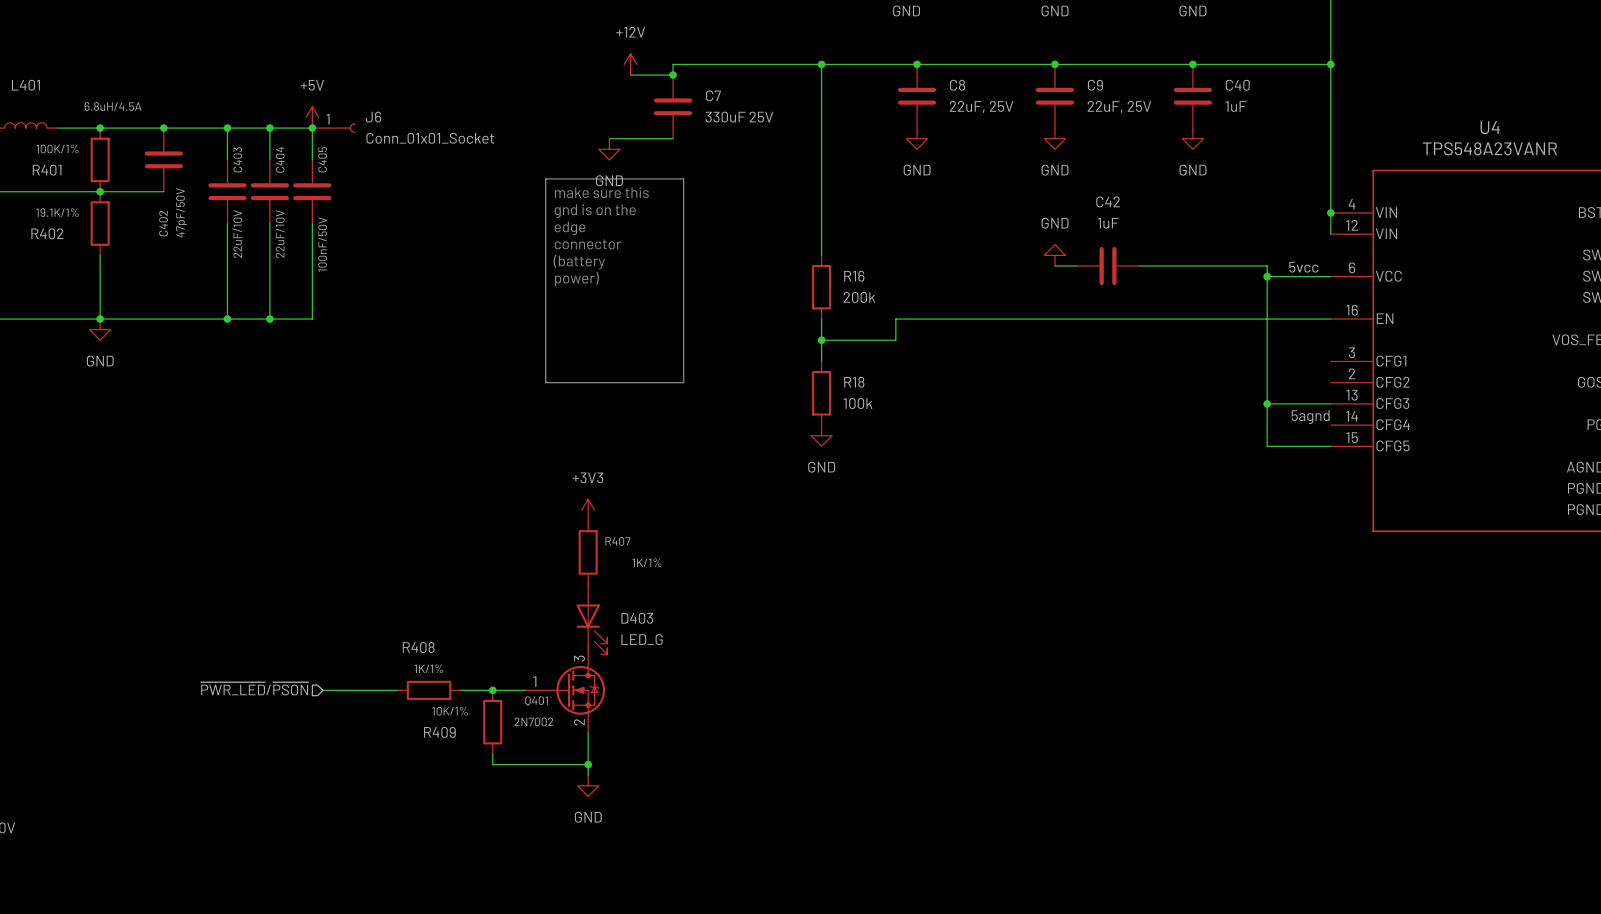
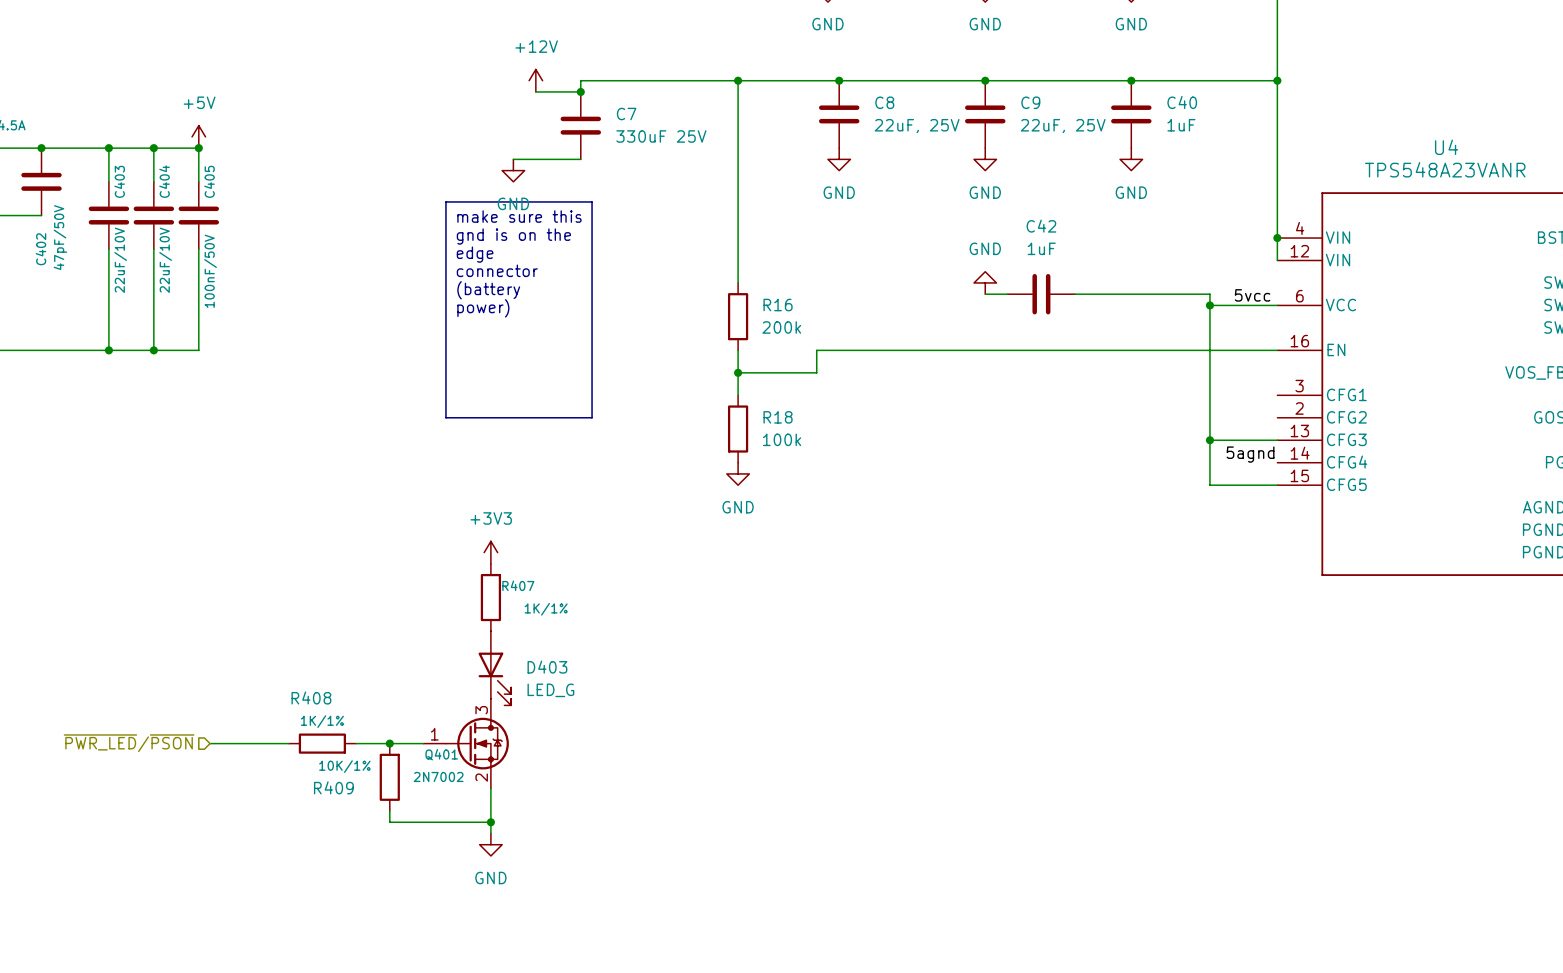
J6: Conn_01x01_Socket (333, 128) -> none

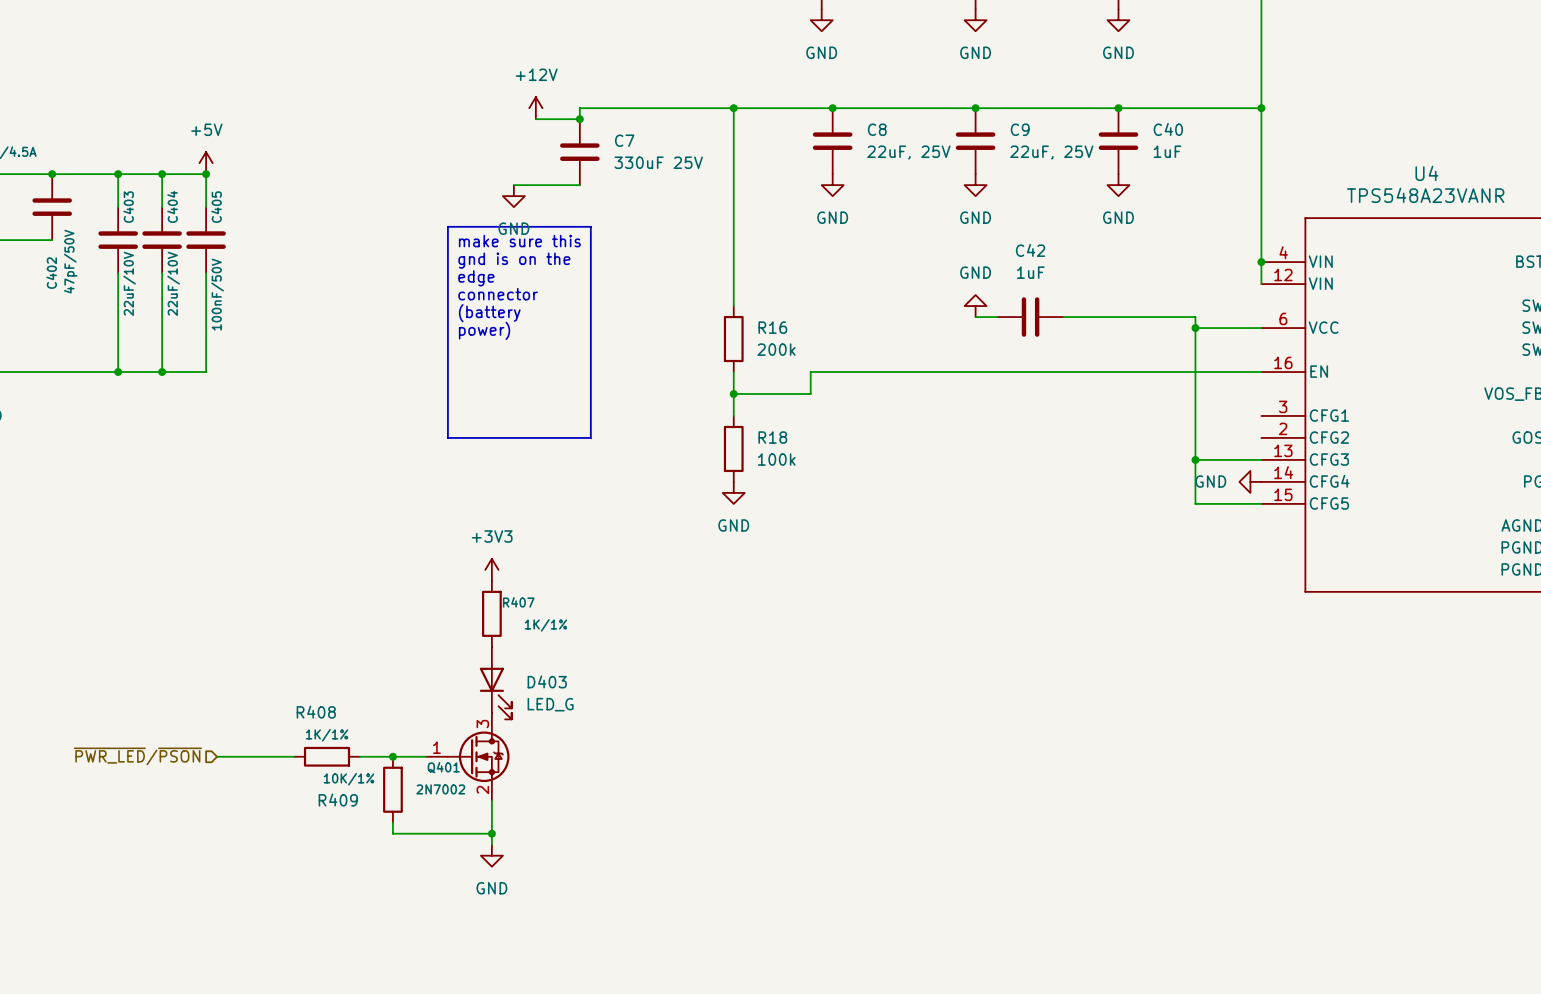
label: 5vcc (1252, 295) -> none
label: 5agnd (1250, 454) -> none
power symbol: none -> GND (1250, 481)

